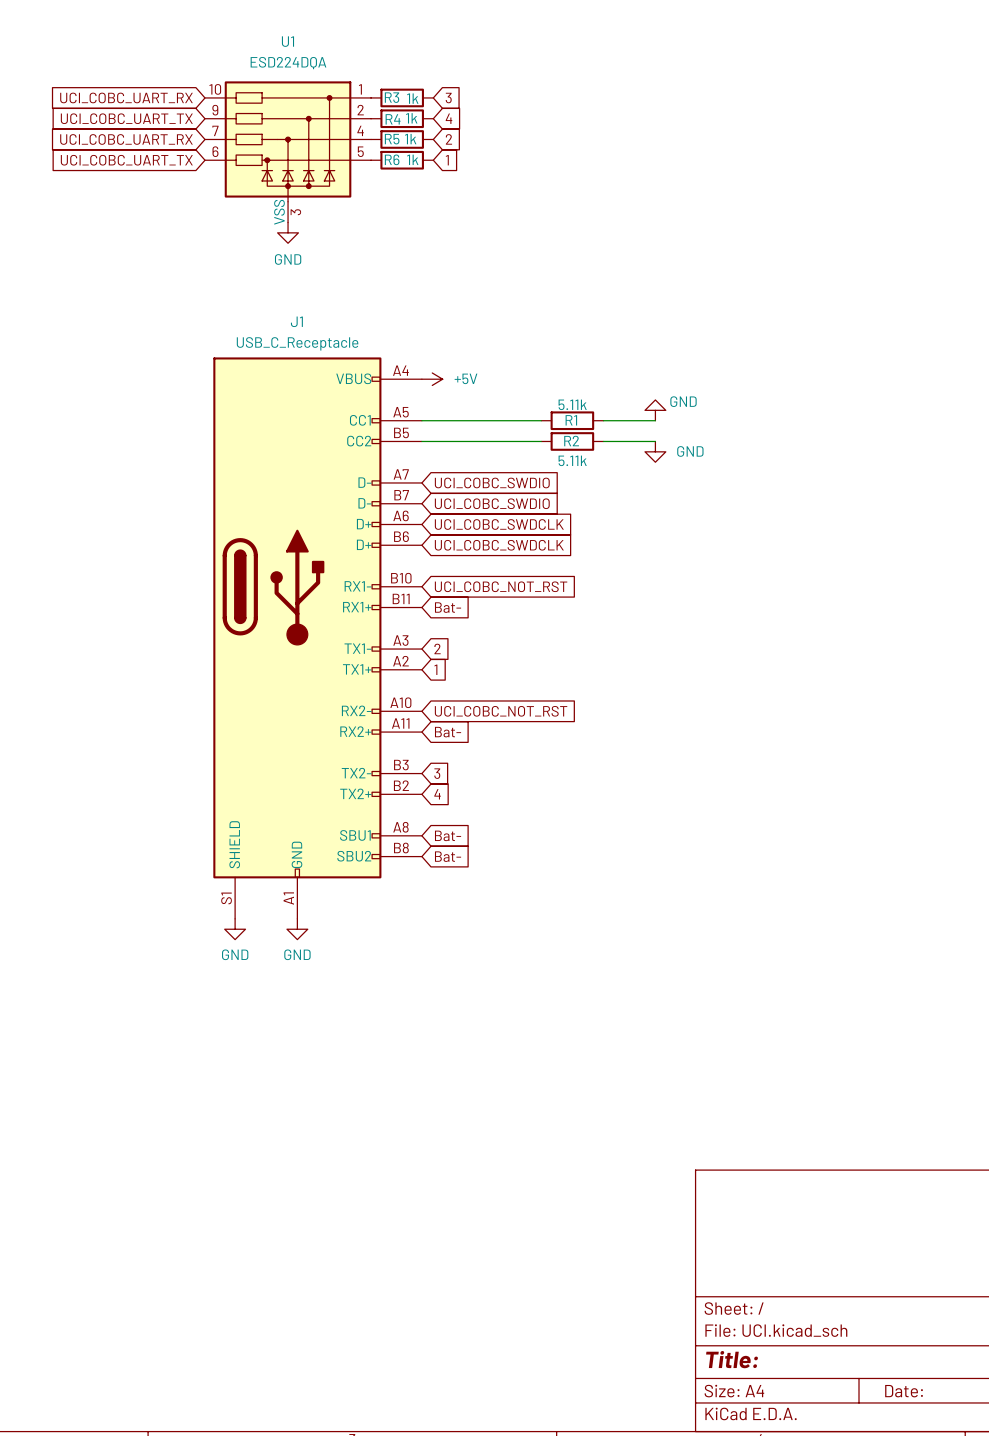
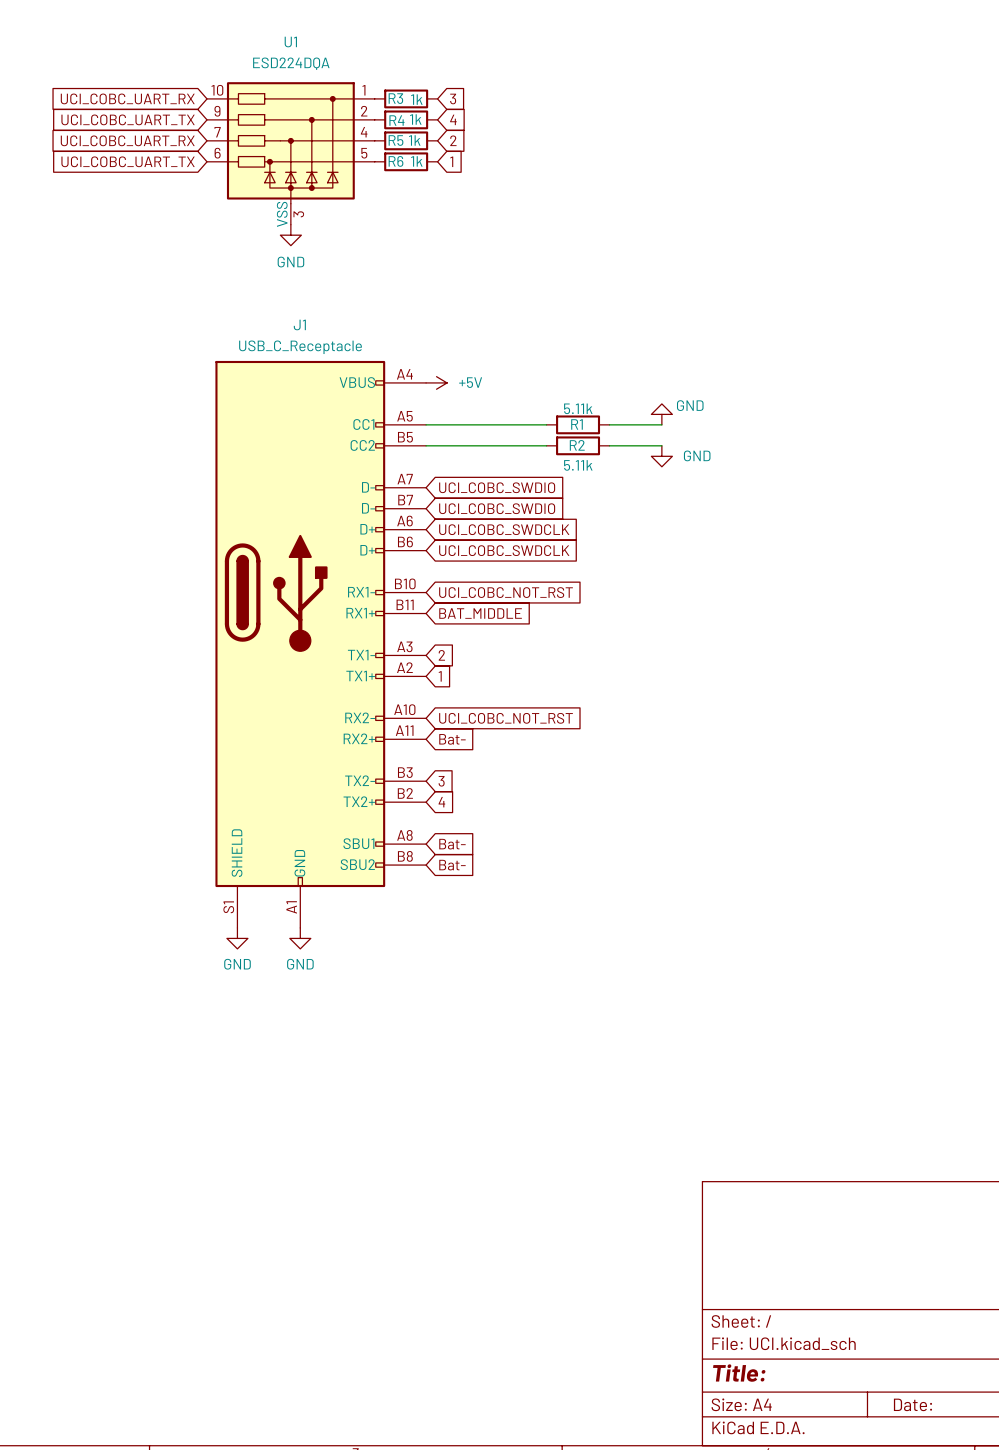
global label: Bat- (448, 607) -> BAT_MIDDLE (480, 613)

